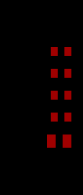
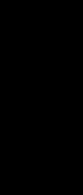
part: (61, 51) -> none
part: (61, 73) -> none
part: (61, 95) -> none
part: (61, 117) -> none
part: (59, 141) -> none

